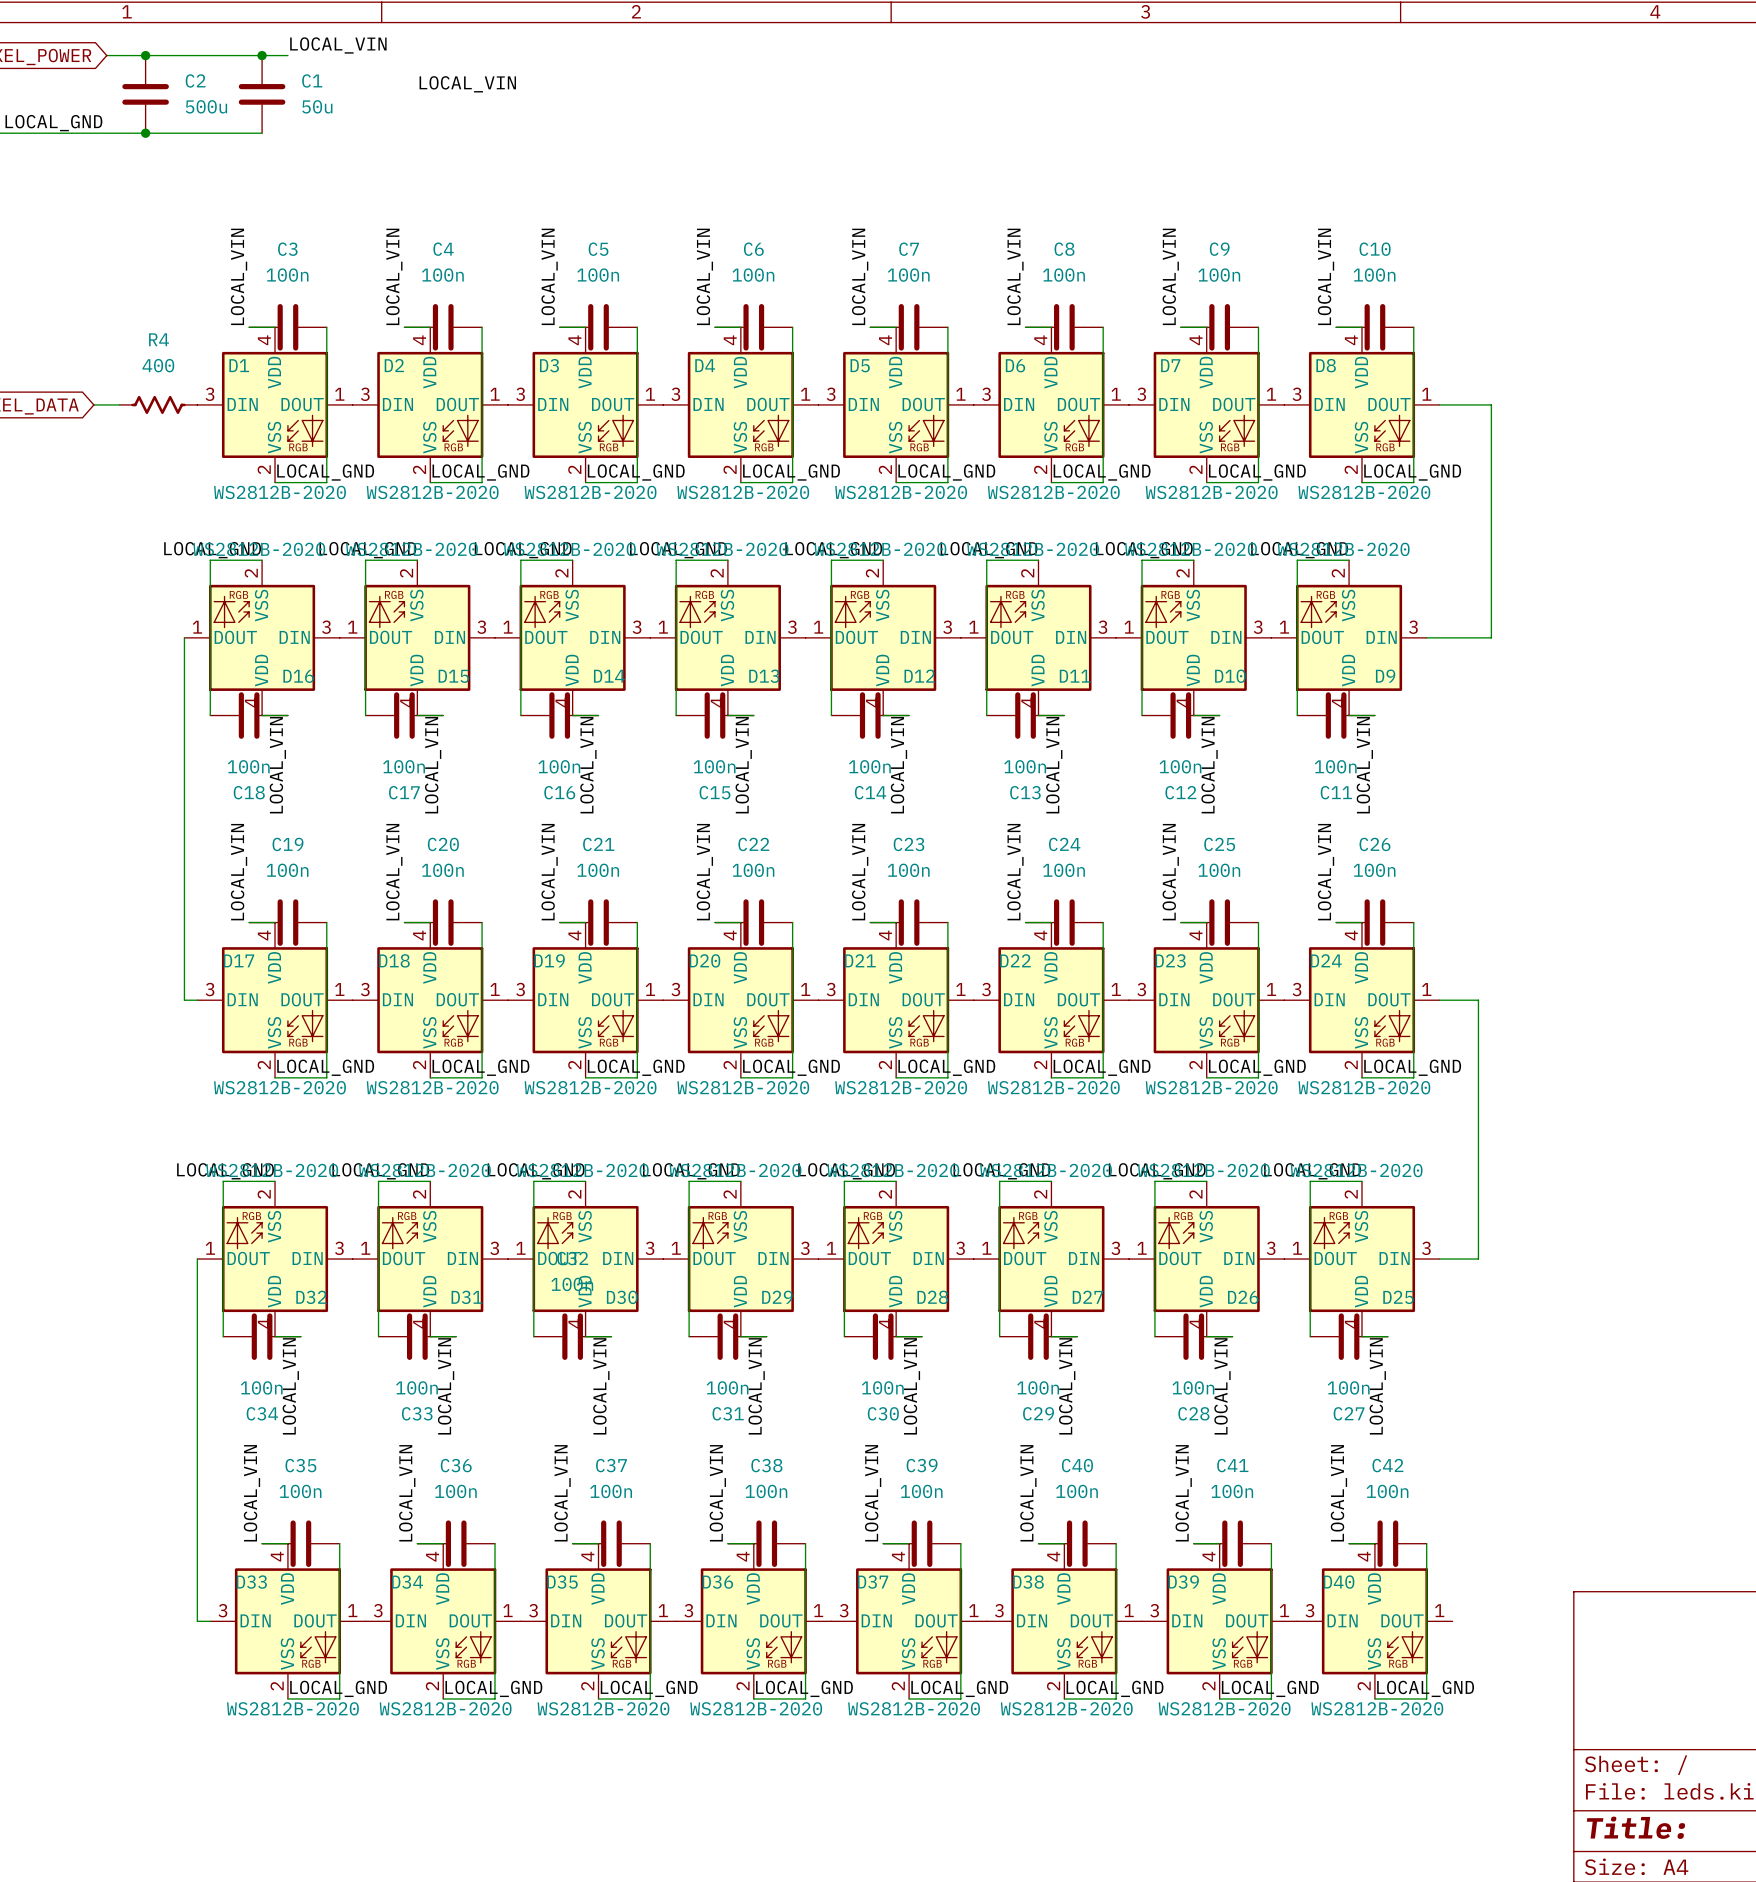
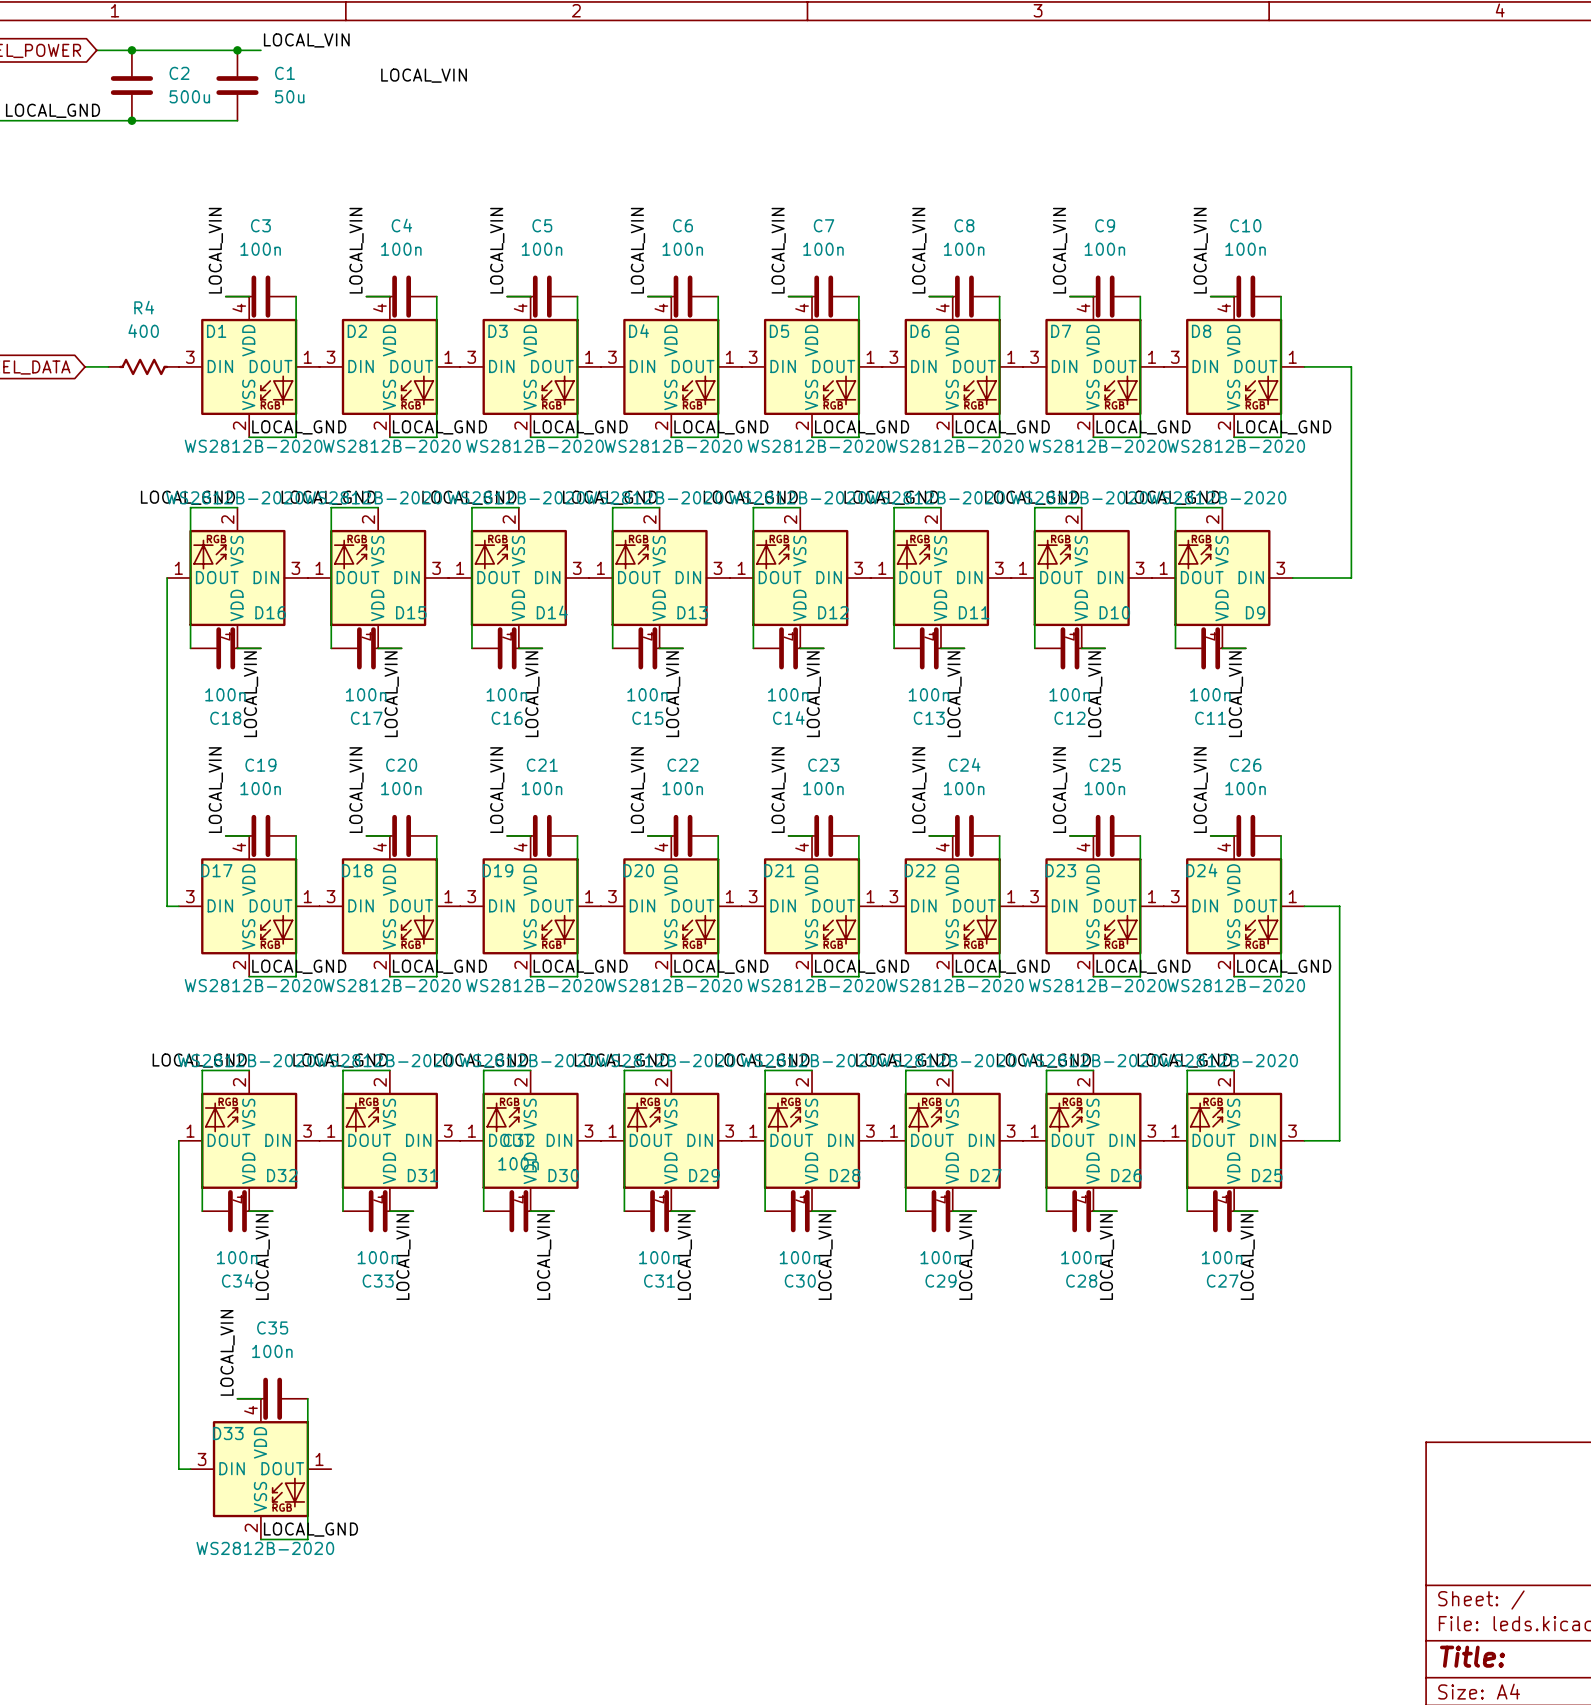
label: LOCAL_VIN (407, 1493) -> none
label: LOCAL_VIN (562, 1493) -> none
label: LOCAL_VIN (717, 1493) -> none
label: LOCAL_VIN (873, 1493) -> none
label: LOCAL_VIN (1028, 1493) -> none
label: LOCAL_VIN (1183, 1493) -> none
label: LOCAL_VIN (1338, 1493) -> none
wire: (417, 1543) (443, 1543) -> none
C36: 100n (456, 1543) -> none
wire: (494, 1543) (494, 1698) (443, 1698) -> none
wire: (572, 1543) (598, 1543) -> none
C37: 100n (611, 1543) -> none
wire: (650, 1543) (650, 1698) (598, 1698) -> none
wire: (727, 1543) (753, 1543) -> none
C38: 100n (766, 1543) -> none
wire: (805, 1543) (805, 1698) (753, 1698) -> none
wire: (883, 1543) (909, 1543) -> none
C39: 100n (922, 1543) -> none
wire: (960, 1543) (960, 1698) (909, 1698) -> none
wire: (1038, 1543) (1064, 1543) -> none
C40: 100n (1077, 1543) -> none
wire: (1116, 1543) (1116, 1698) (1064, 1698) -> none
wire: (1193, 1543) (1219, 1543) -> none
C41: 100n (1232, 1543) -> none
wire: (1271, 1543) (1271, 1698) (1219, 1698) -> none
wire: (1349, 1543) (1374, 1543) -> none
C42: 100n (1387, 1543) -> none
wire: (1426, 1543) (1426, 1698) (1374, 1698) -> none
D34: WS2812B-2020 (443, 1621) -> none
D35: WS2812B-2020 (598, 1621) -> none
D36: WS2812B-2020 (753, 1621) -> none
D37: WS2812B-2020 (909, 1621) -> none
D38: WS2812B-2020 (1064, 1621) -> none
D39: WS2812B-2020 (1219, 1621) -> none
D40: WS2812B-2020 (1374, 1621) -> none
label: LOCAL_GND (493, 1688) -> none
label: LOCAL_GND (649, 1688) -> none
label: LOCAL_GND (804, 1688) -> none
label: LOCAL_GND (959, 1688) -> none
label: LOCAL_GND (1115, 1688) -> none
label: LOCAL_GND (1270, 1688) -> none
label: LOCAL_GND (1425, 1688) -> none

